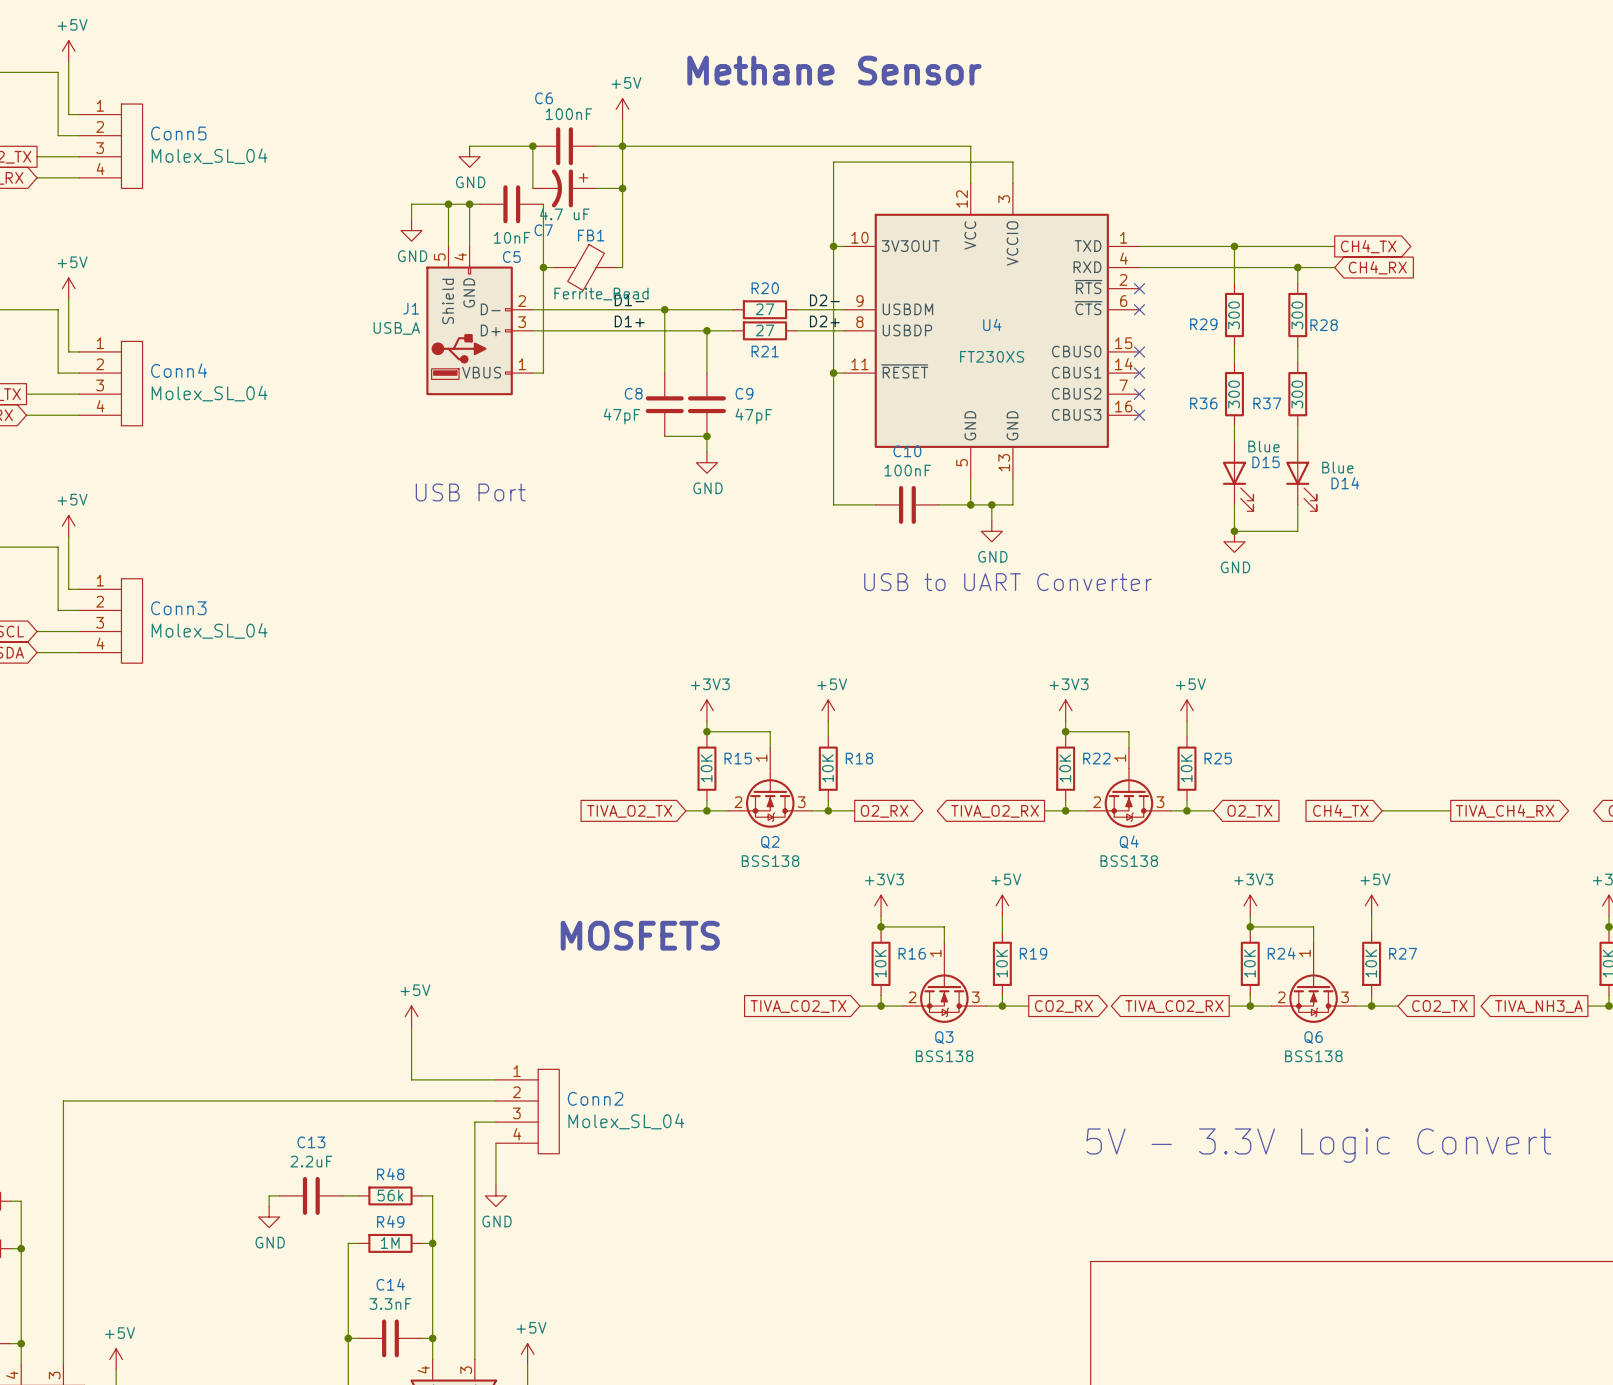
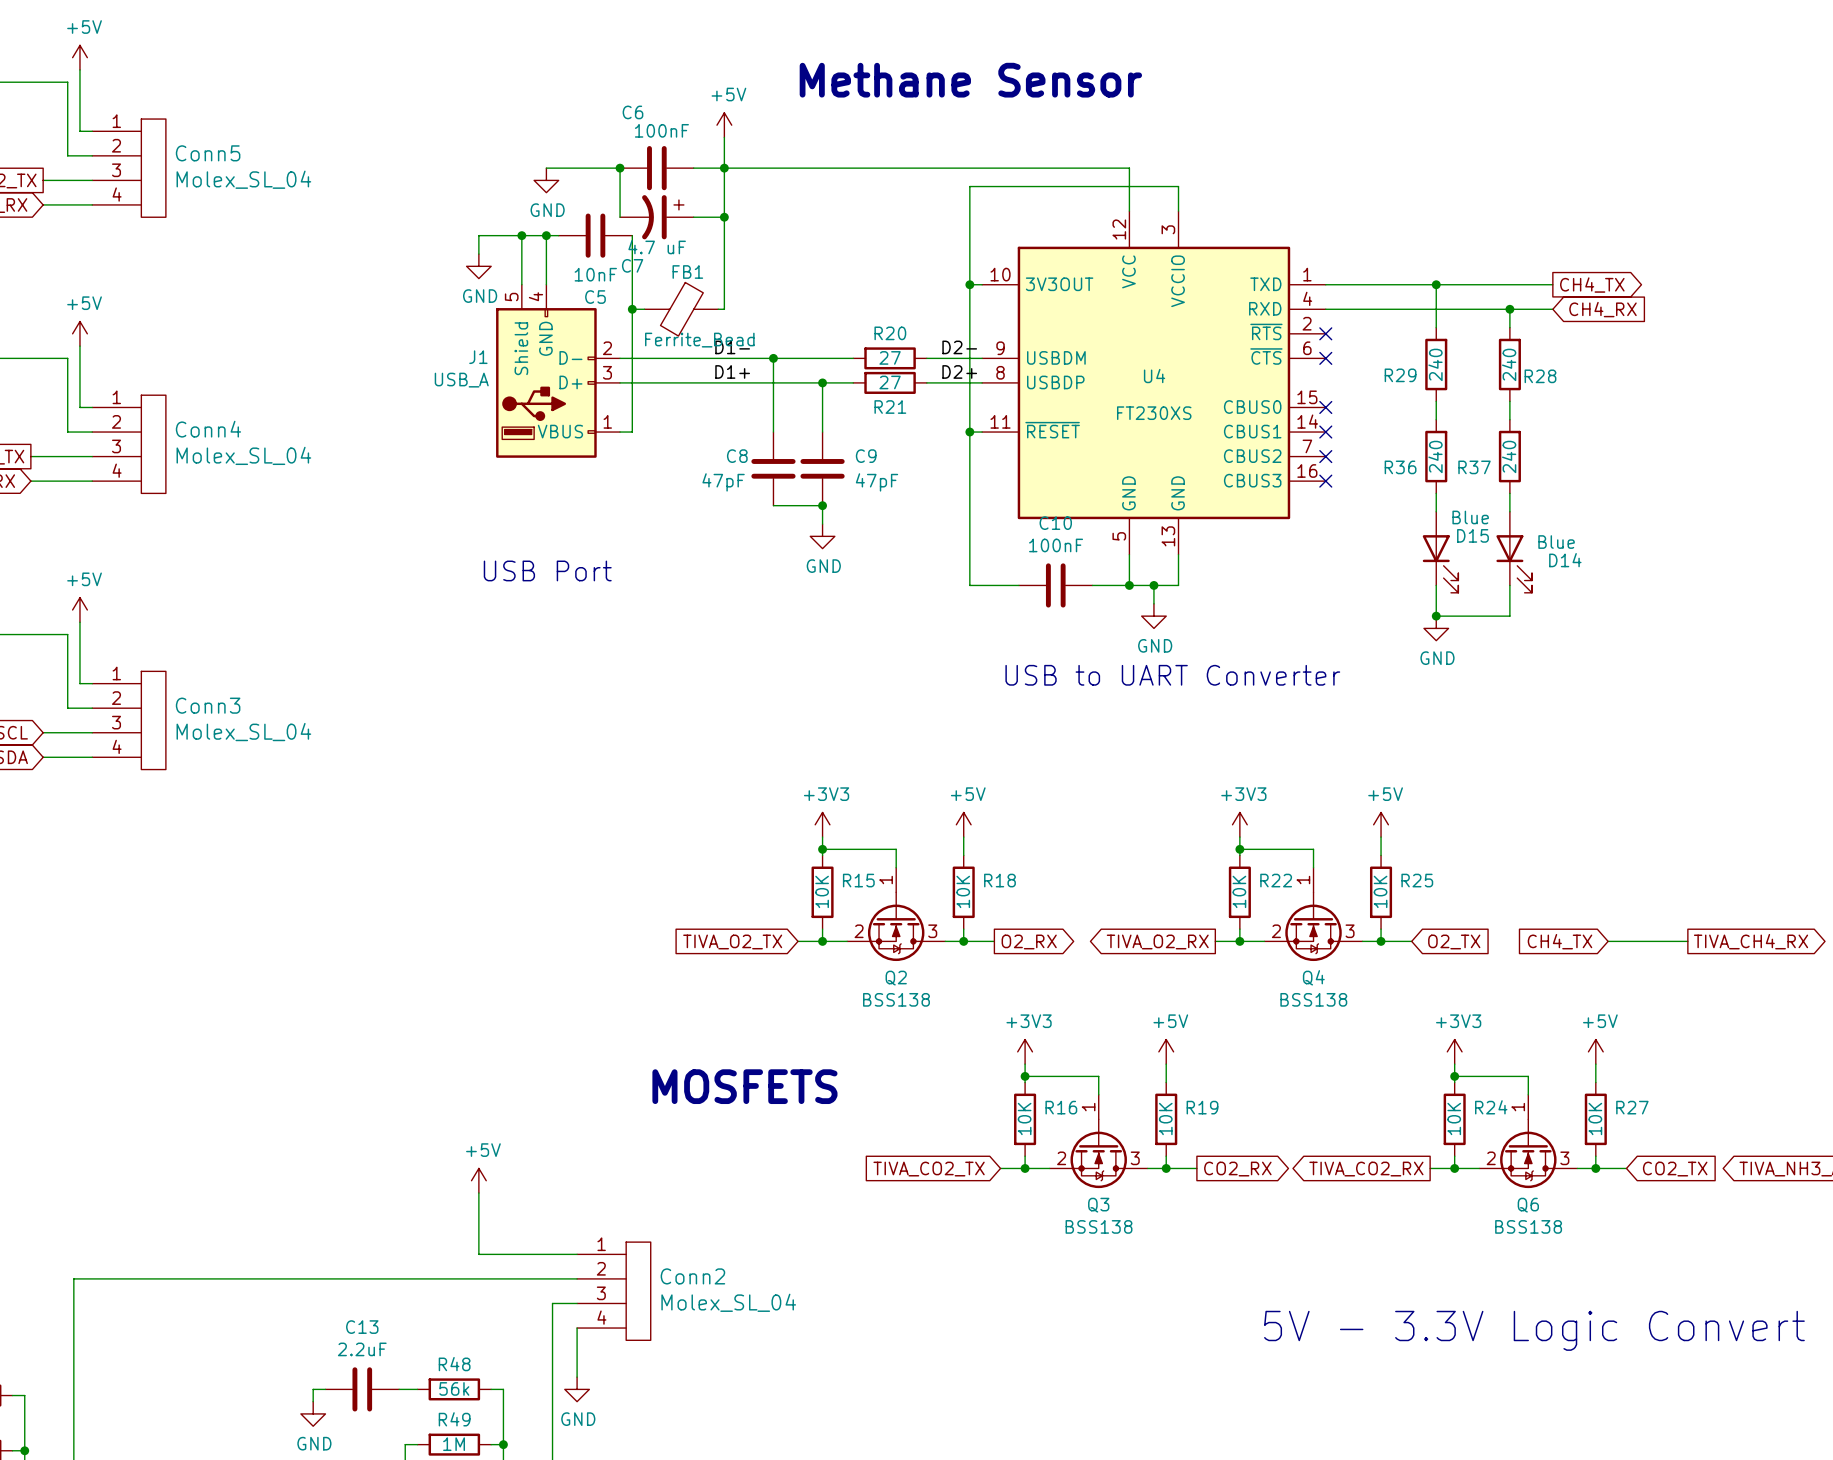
R29 value: 300 (1234, 315) -> 240 (1435, 364)
R28 value: 300 (1297, 315) -> 240 (1509, 364)
R36 value: 300 (1234, 394) -> 240 (1435, 456)
R37 value: 300 (1297, 394) -> 240 (1509, 456)

